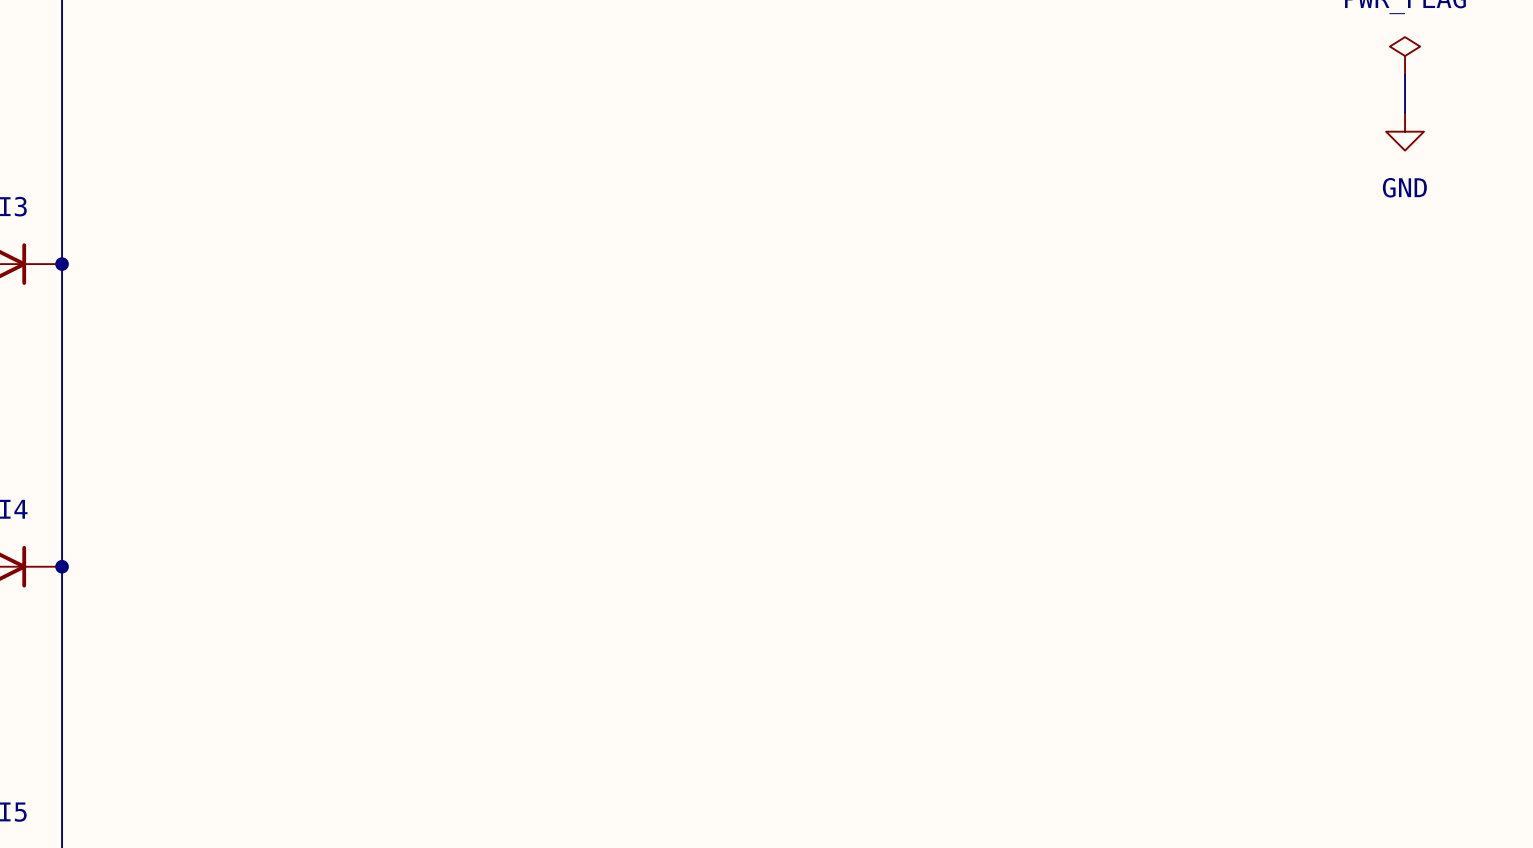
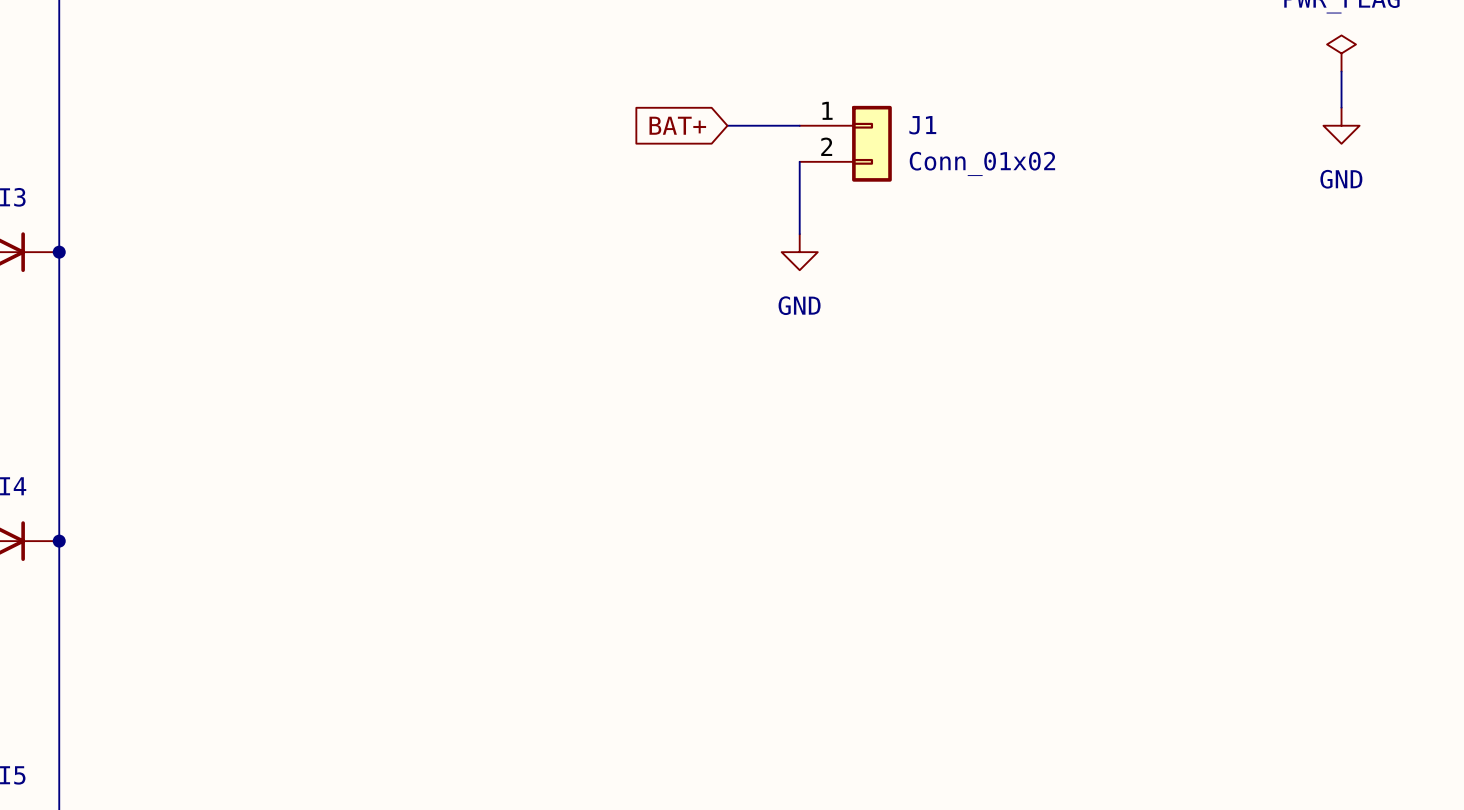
global label: none -> BAT+ (677, 125)
wire: none -> (727, 125) (799, 125)
J1: none -> Conn_01x02 (845, 143)
wire: none -> (799, 161) (799, 234)
power symbol: none -> GND (799, 252)

